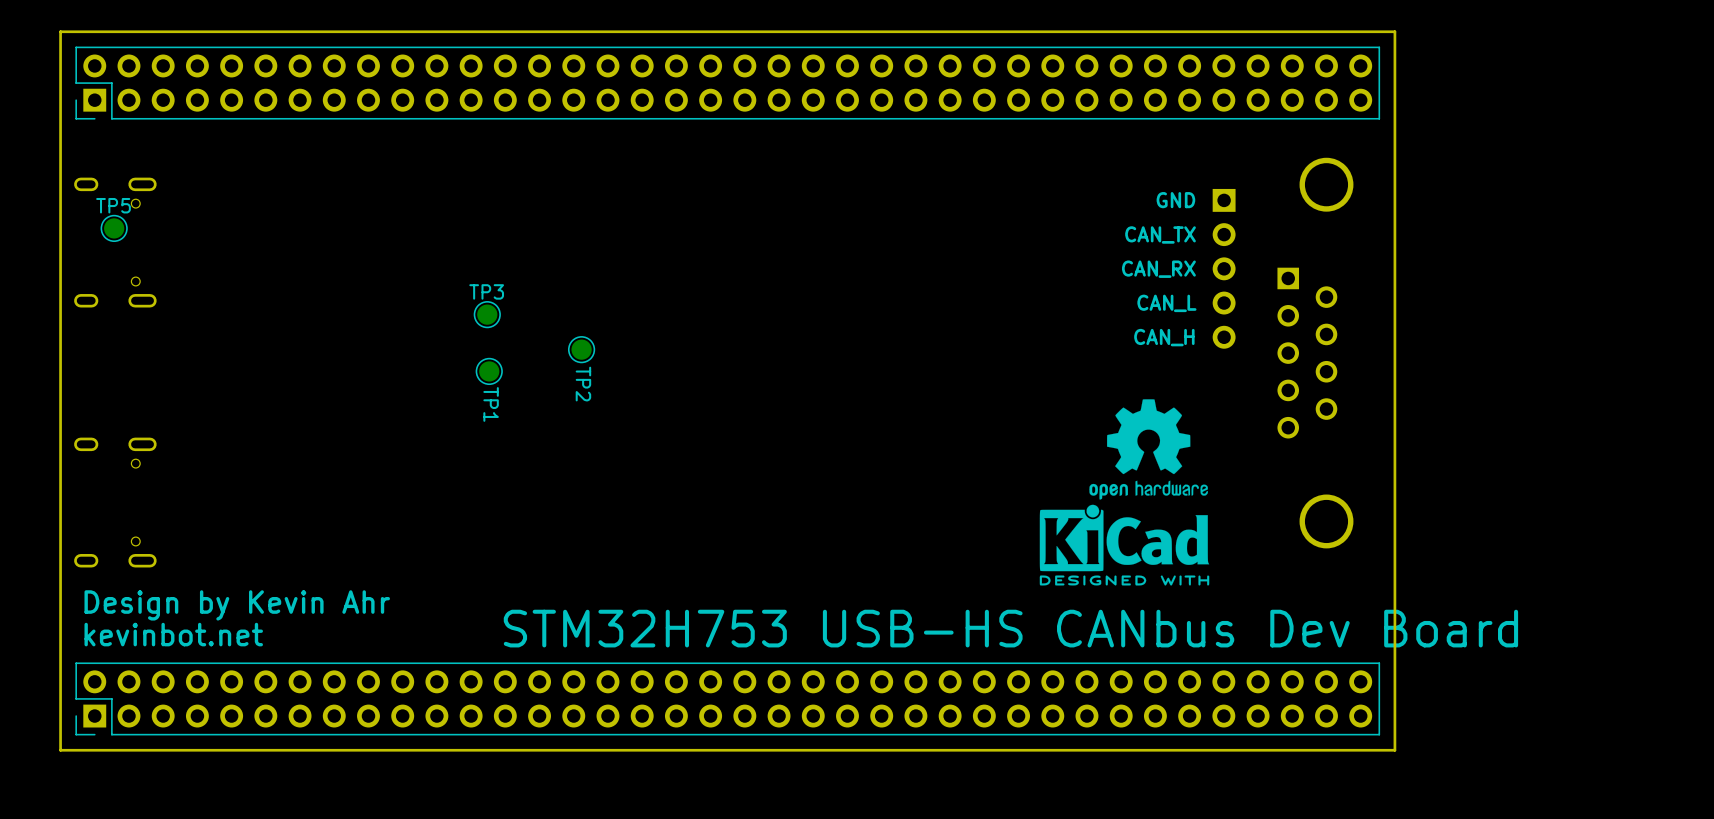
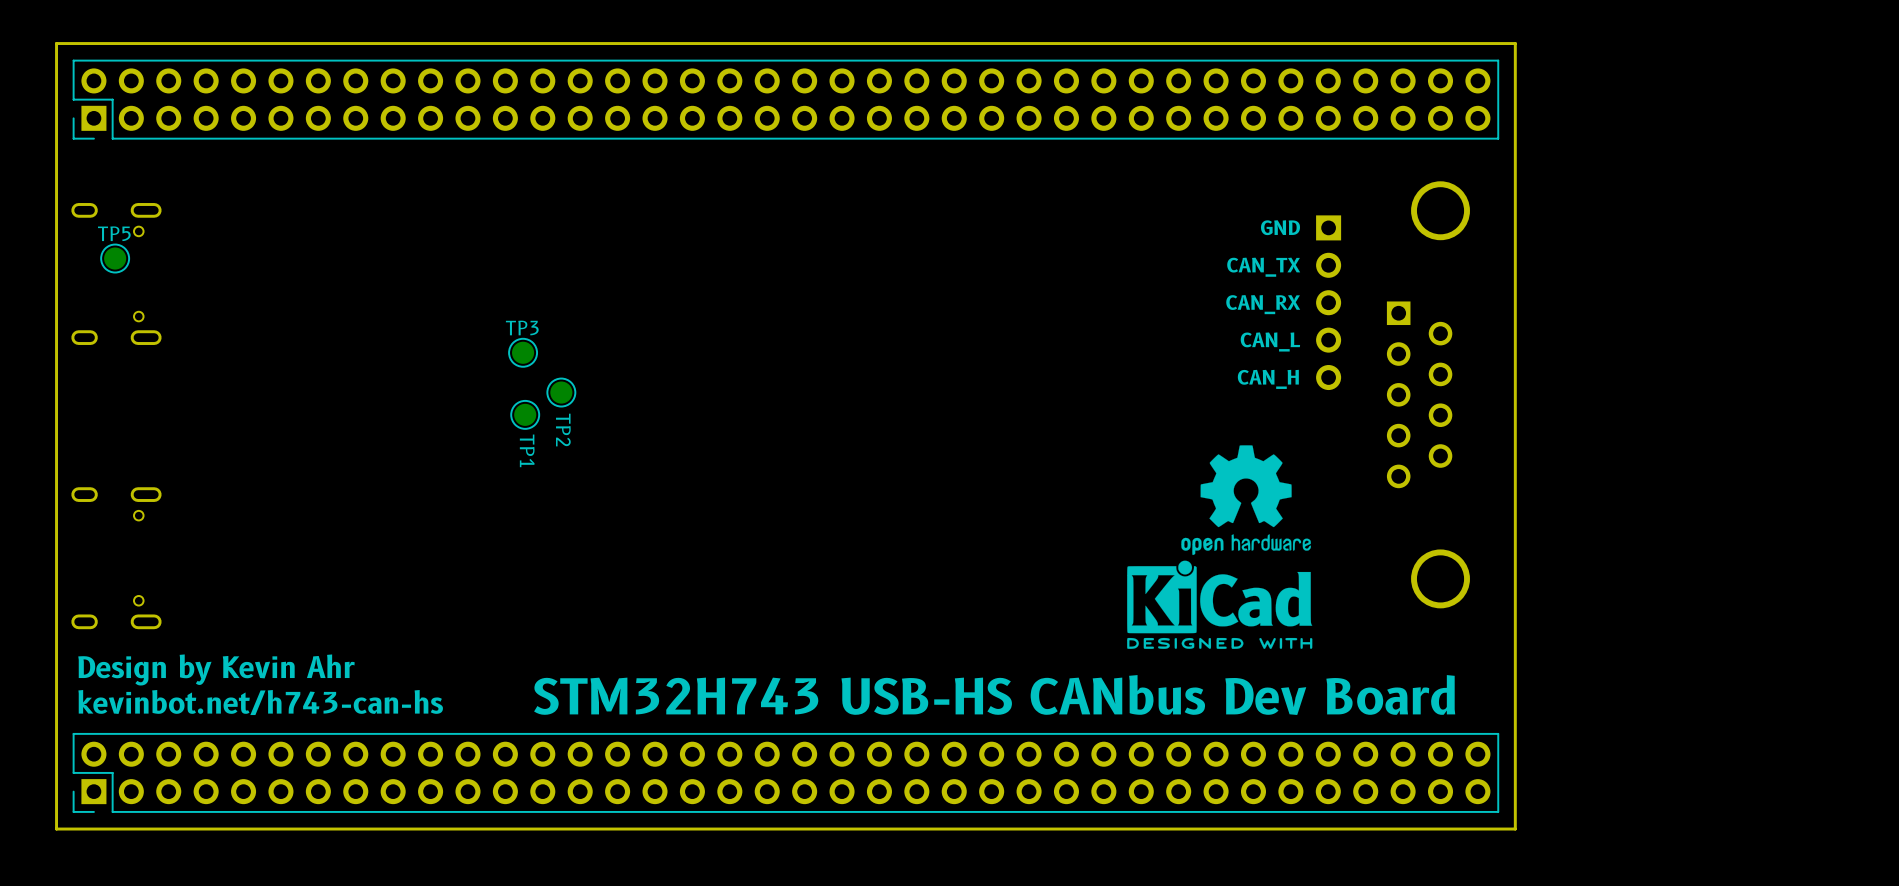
TP2 position: (581, 349) -> (561, 392)
text: STM32H753 USB-HS CANbus Dev Board (1010, 628) -> STM32H743 USB-HS CANbus Dev Board (994, 695)
text: kevinbot.net (173, 634) -> kevinbot.net/h743-can-hs (260, 702)

